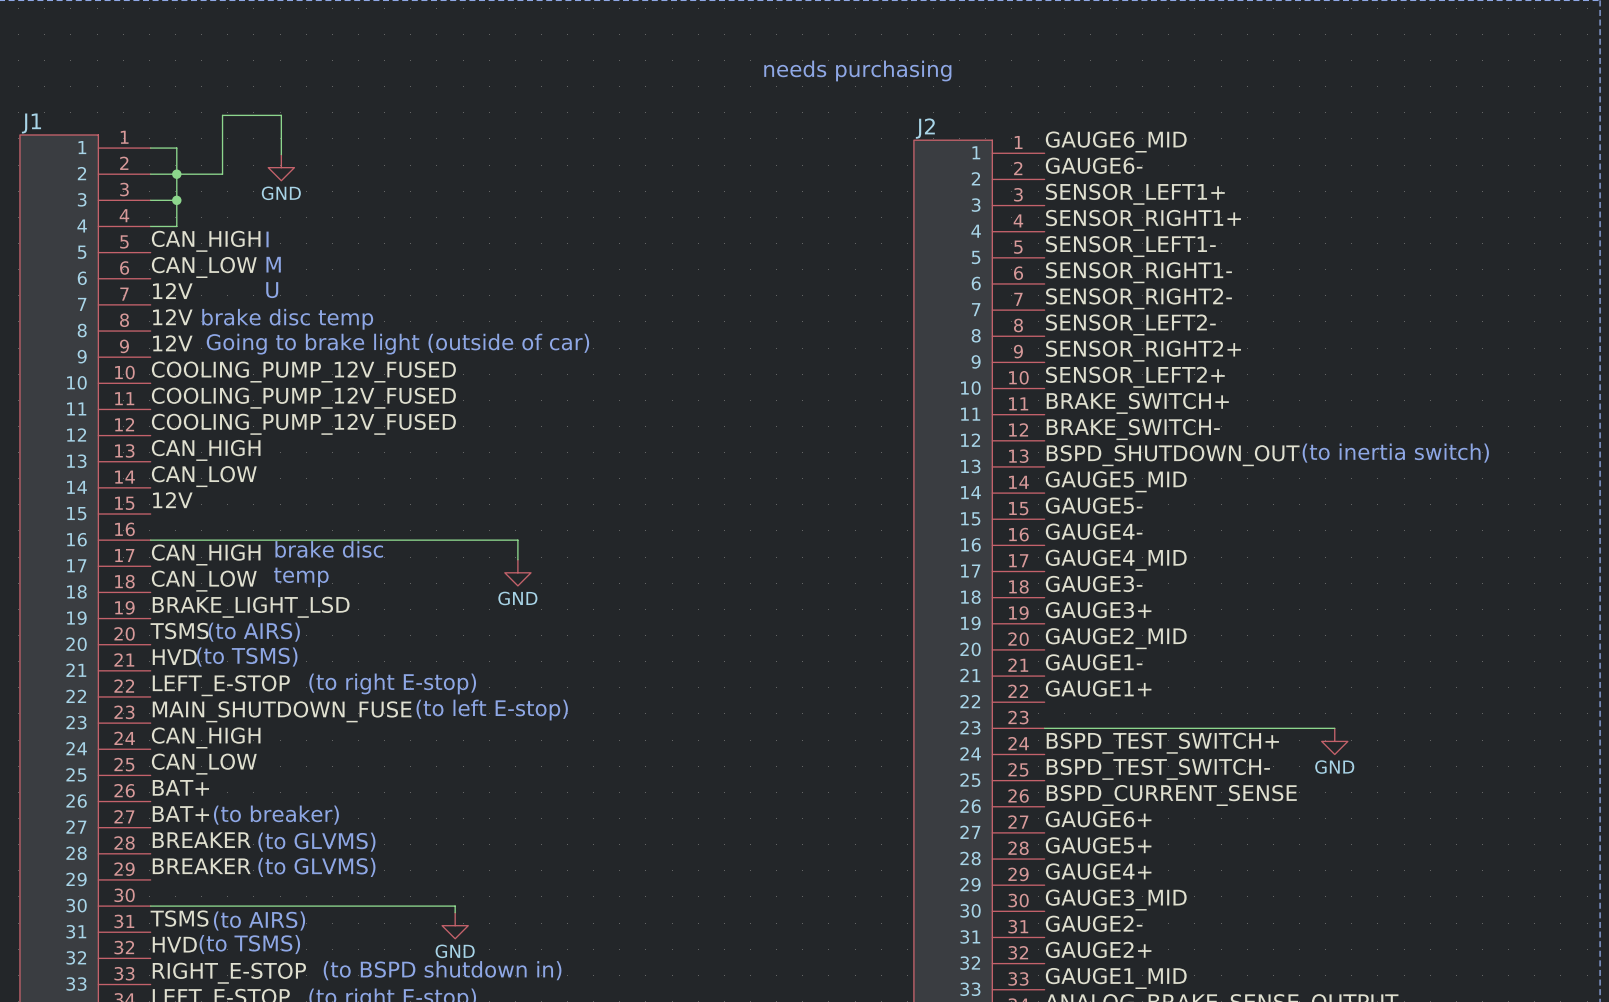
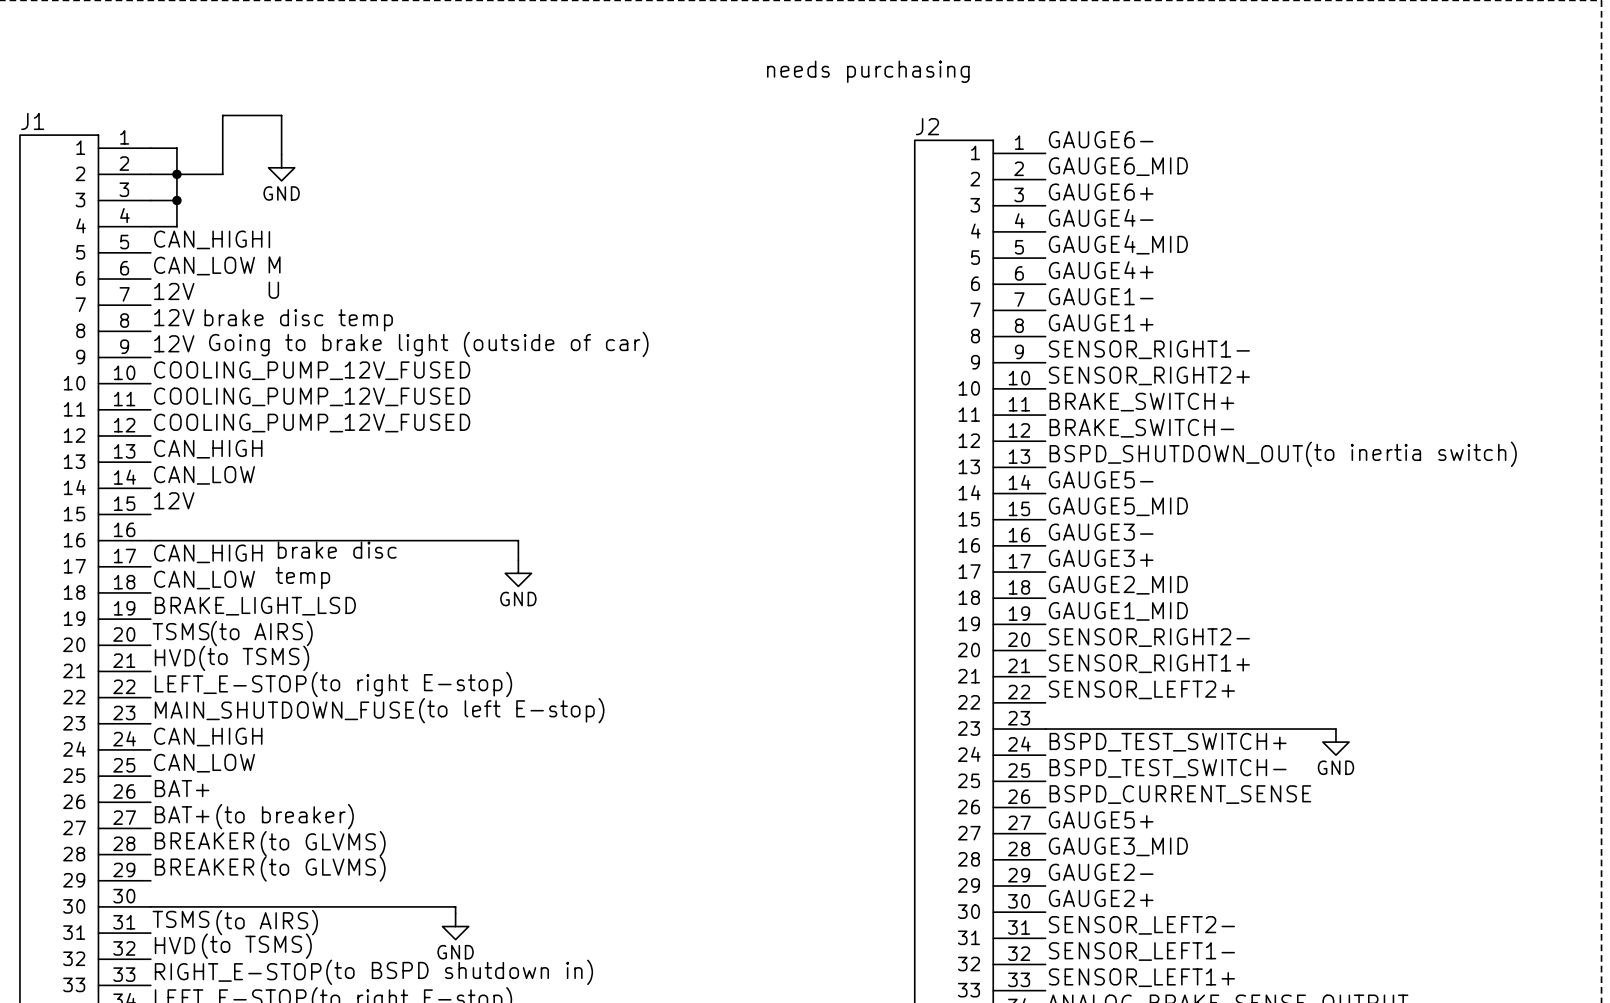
label: GAUGE6_MID (1116, 141) -> GAUGE6- (1101, 139)
label: GAUGE6- (1094, 165) -> GAUGE6_MID (1118, 166)
label: SENSOR_LEFT1+ (1135, 194) -> GAUGE6+ (1101, 192)
label: SENSOR_RIGHT1+ (1143, 220) -> GAUGE4- (1101, 217)
label: SENSOR_LEFT1- (1130, 246) -> GAUGE4_MID (1118, 244)
label: SENSOR_RIGHT1- (1138, 272) -> GAUGE4+ (1101, 270)
label: SENSOR_RIGHT2- (1138, 298) -> GAUGE1- (1101, 296)
label: SENSOR_LEFT2- (1130, 324) -> GAUGE1+ (1101, 322)
label: SENSOR_RIGHT2+ (1143, 351) -> SENSOR_RIGHT1- (1149, 349)
label: SENSOR_LEFT2+ (1135, 377) -> SENSOR_RIGHT2+ (1149, 375)
label: GAUGE5_MID (1116, 481) -> GAUGE5- (1101, 479)
label: GAUGE5- (1094, 505) -> GAUGE5_MID (1118, 506)
label: GAUGE4- (1094, 531) -> GAUGE3- (1101, 532)
label: GAUGE4_MID (1116, 560) -> GAUGE3+ (1101, 558)
label: GAUGE3- (1094, 583) -> GAUGE2_MID (1118, 585)
label: GAUGE3+ (1098, 610) -> GAUGE1_MID (1118, 611)
label: GAUGE2_MID (1116, 638) -> SENSOR_RIGHT2- (1149, 637)
label: GAUGE1- (1094, 662) -> SENSOR_RIGHT1+ (1149, 663)
label: GAUGE1+ (1098, 688) -> SENSOR_LEFT2+ (1141, 689)
label: GAUGE6+ (1098, 819) -> GAUGE5+ (1101, 819)
label: GAUGE5+ (1098, 845) -> GAUGE3_MID (1118, 846)
label: GAUGE4+ (1098, 871) -> GAUGE2- (1101, 872)
label: GAUGE3_MID (1116, 900) -> GAUGE2+ (1101, 898)
label: GAUGE2- (1094, 923) -> SENSOR_LEFT2- (1141, 925)
label: GAUGE2+ (1098, 949) -> SENSOR_LEFT1- (1141, 951)
label: GAUGE1_MID (1116, 978) -> SENSOR_LEFT1+ (1141, 977)

